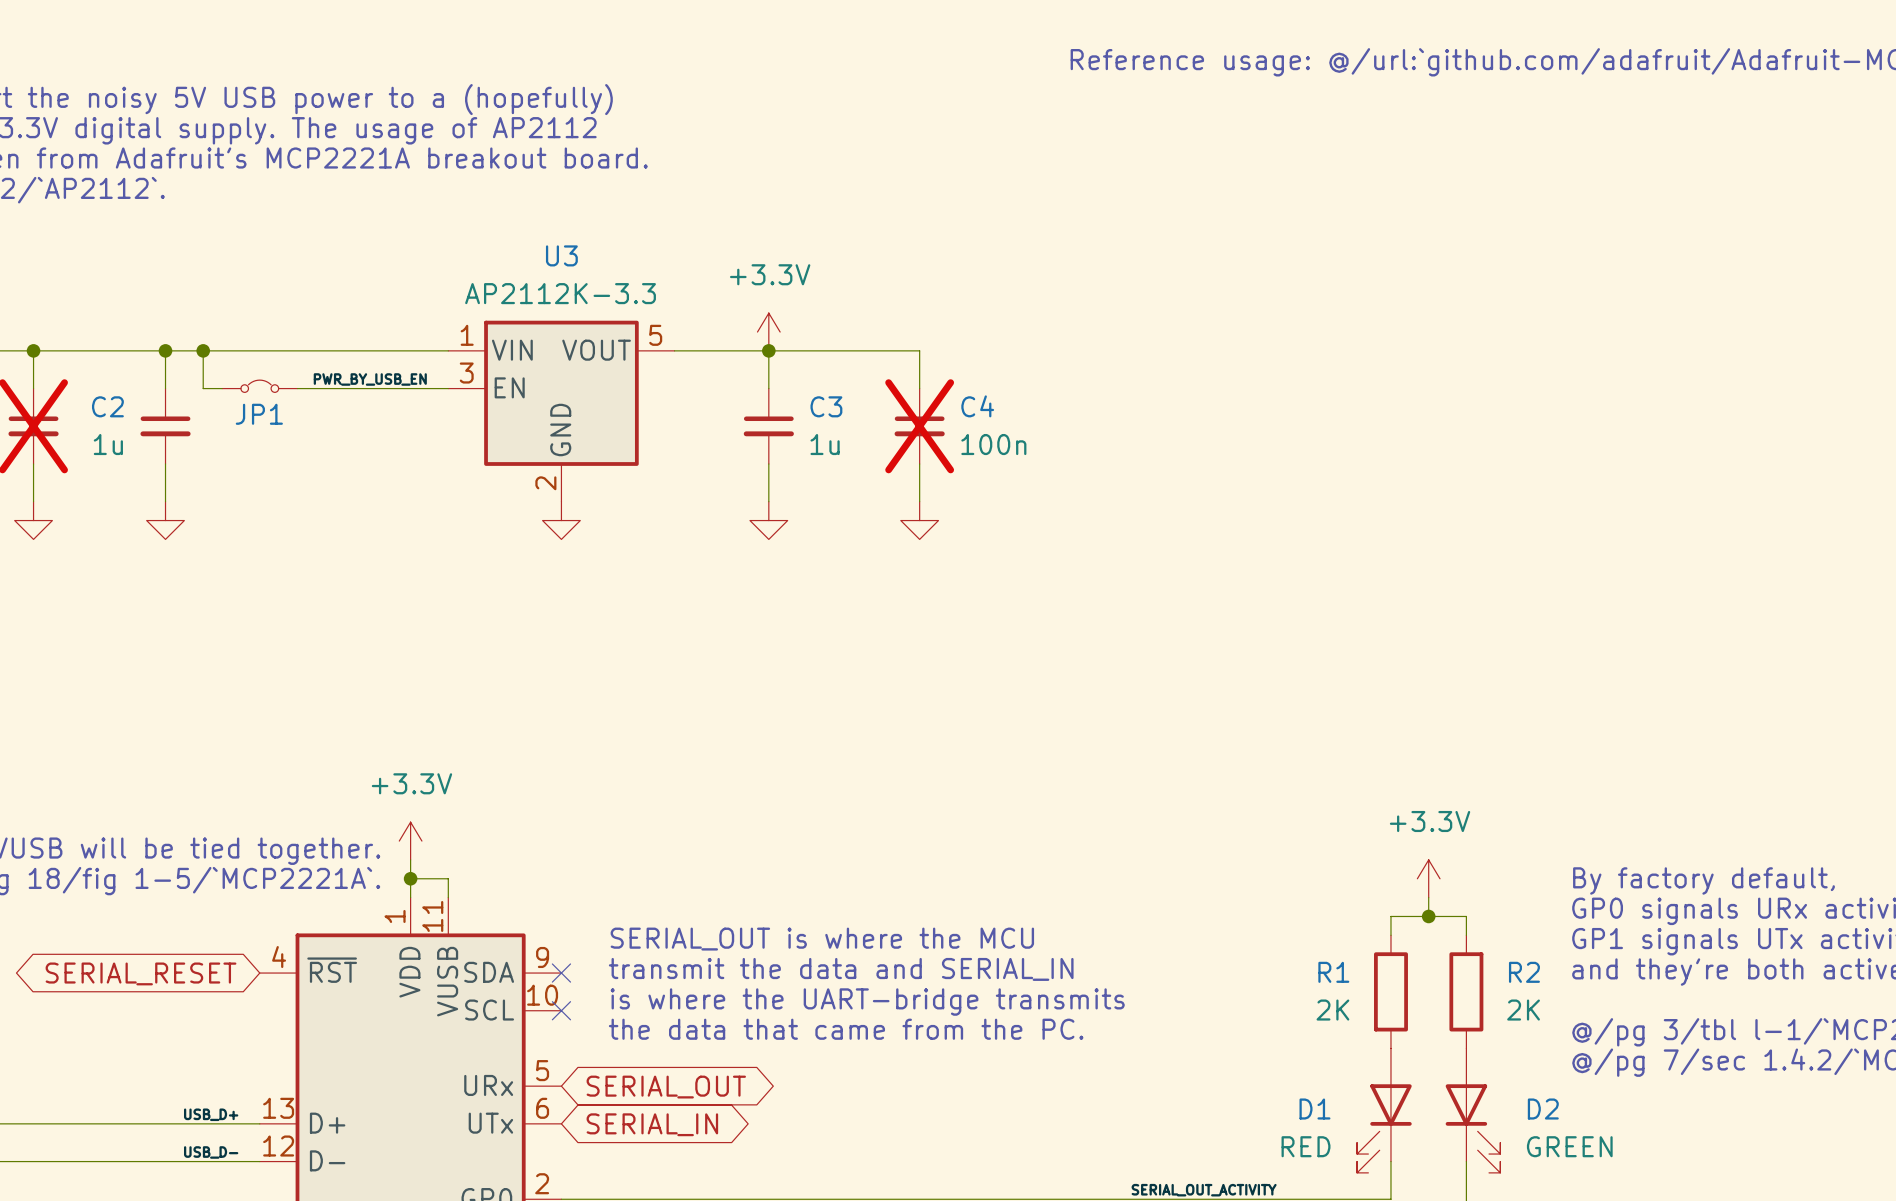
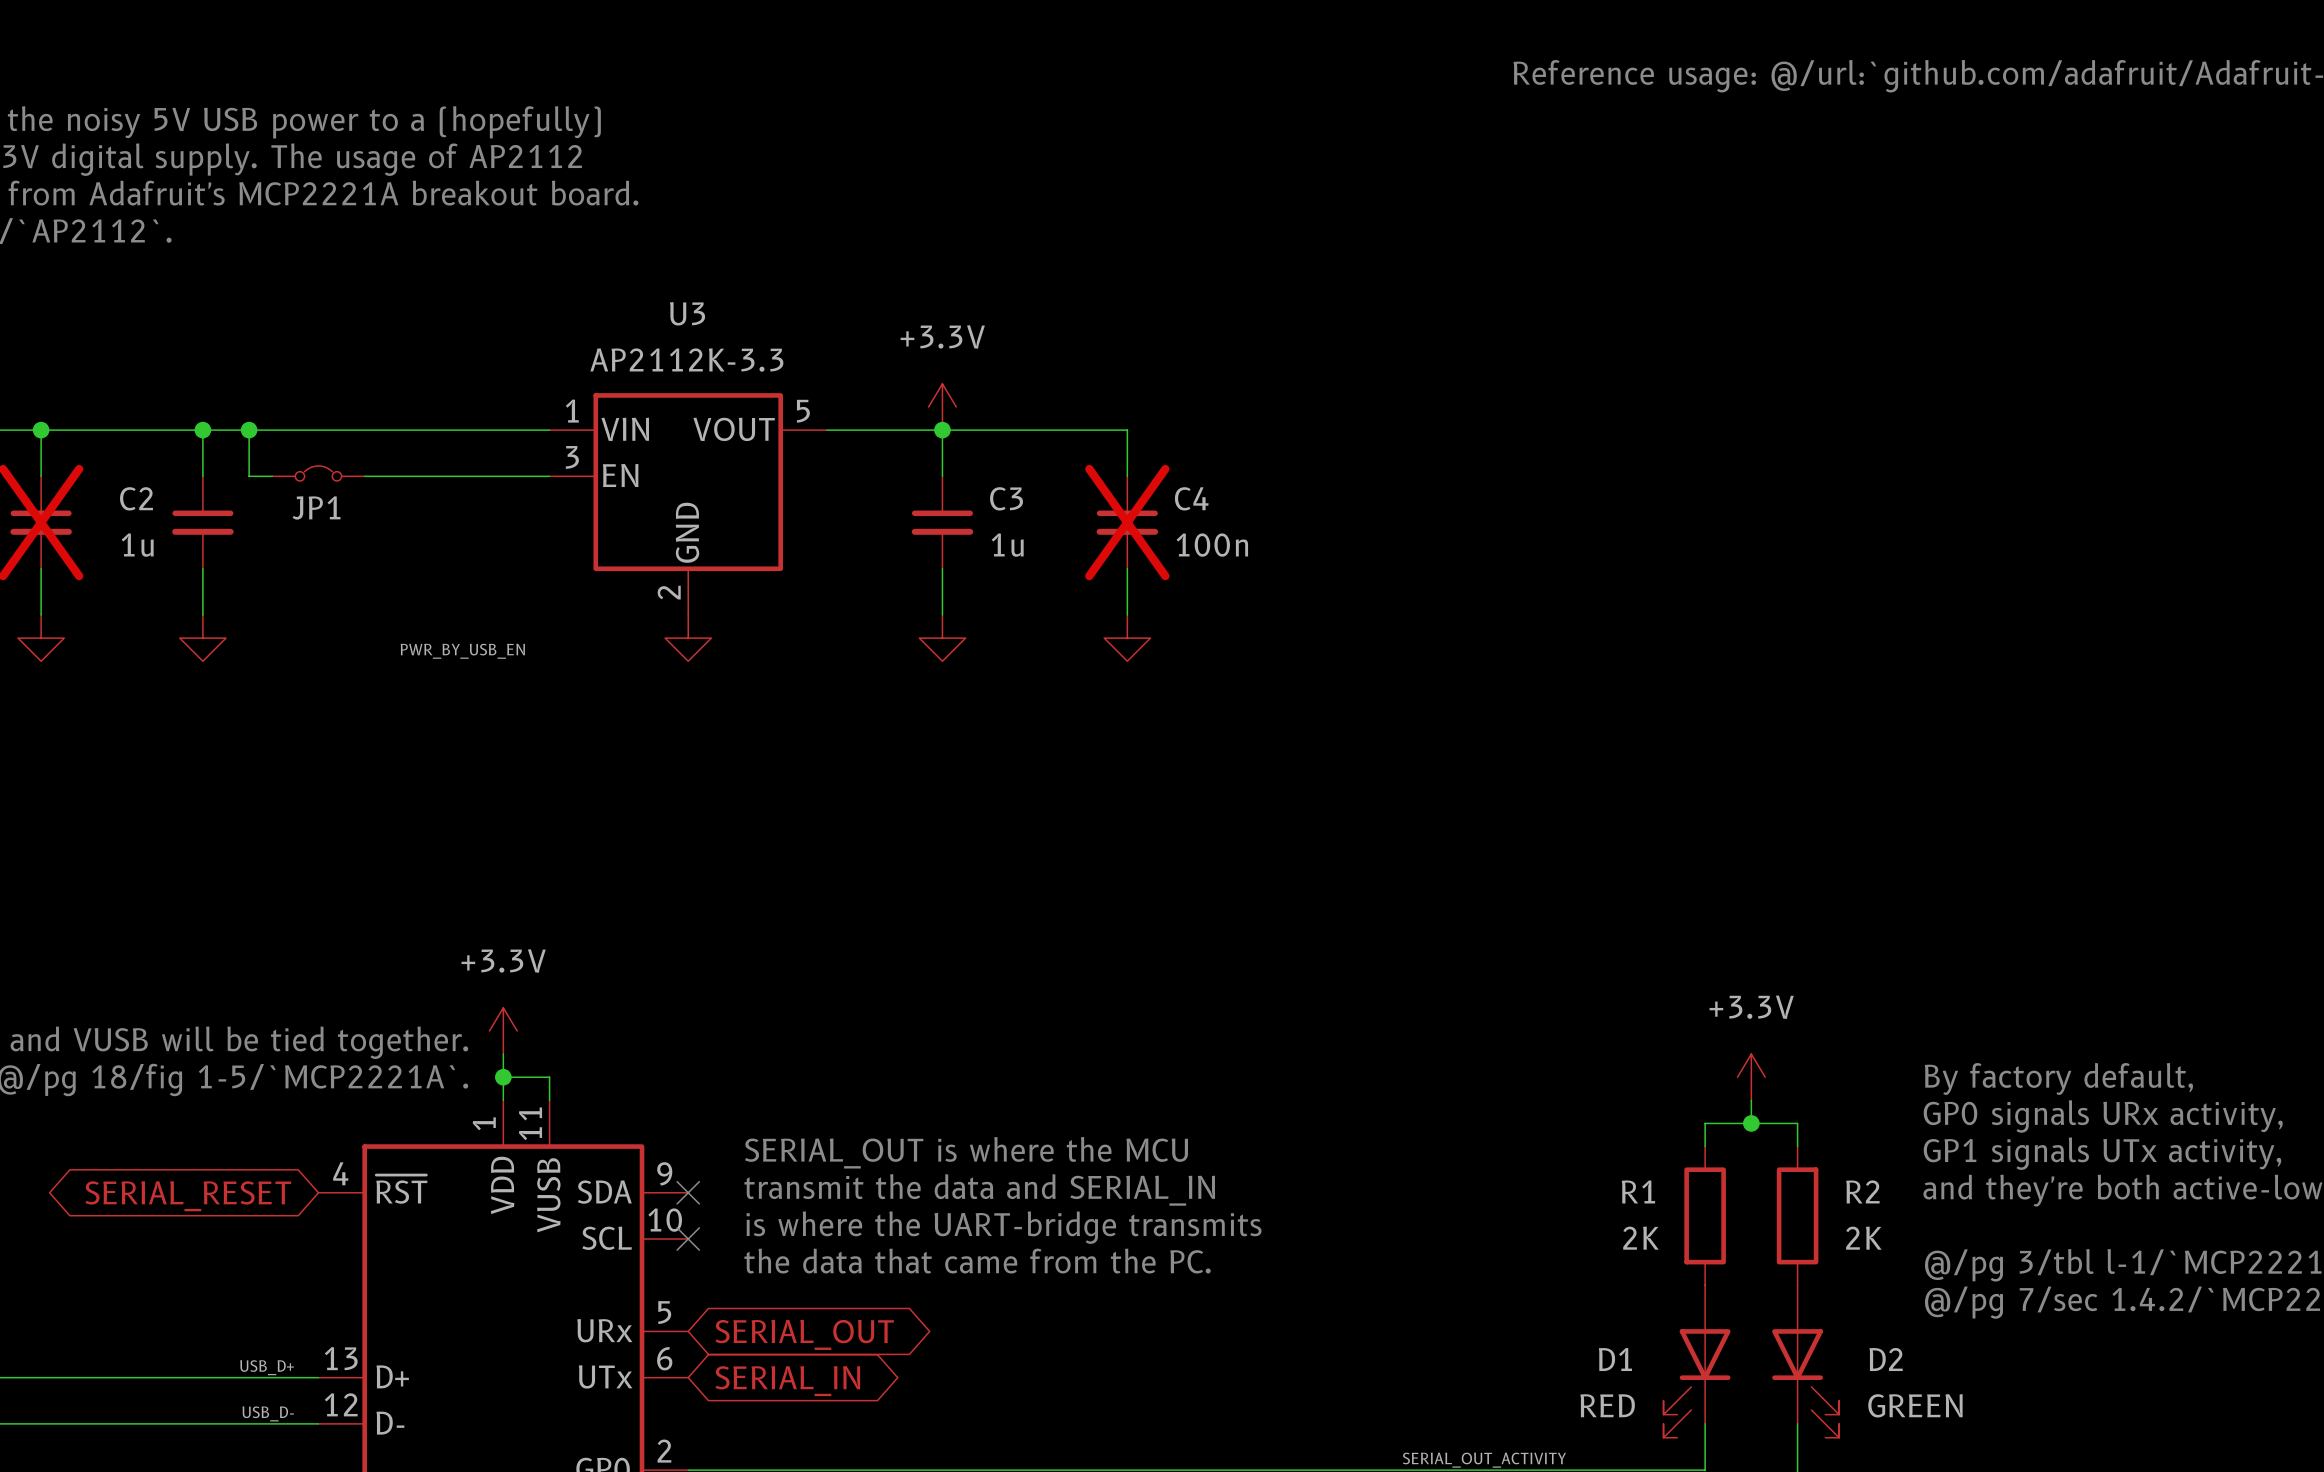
label position: PWR_BY_USB_EN (370, 379) -> PWR_BY_USB_EN (462, 651)

